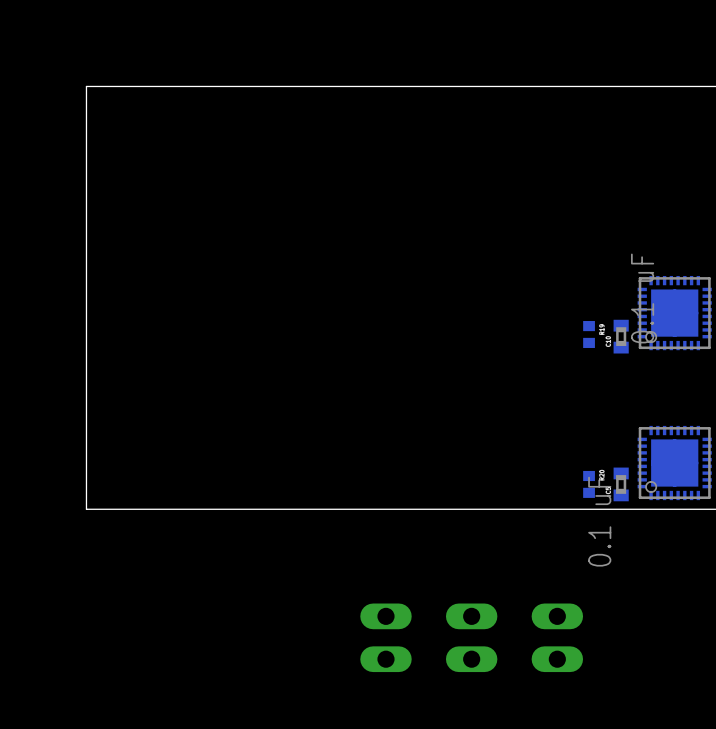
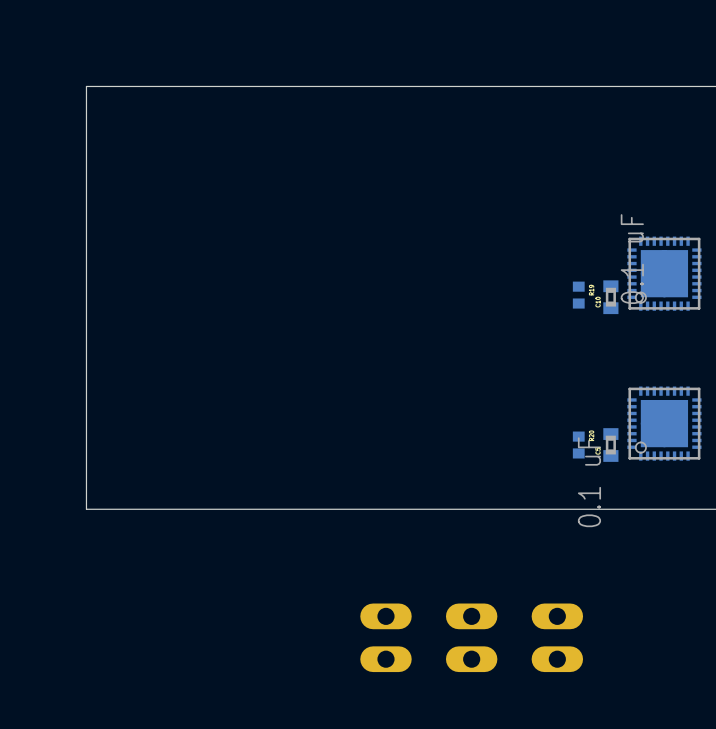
part position: (674, 313) -> (664, 273)
part position: (589, 334) -> (578, 295)
part position: (621, 336) -> (610, 297)
part position: (674, 463) -> (664, 423)
part position: (589, 484) -> (578, 445)
part position: (621, 484) -> (610, 445)

